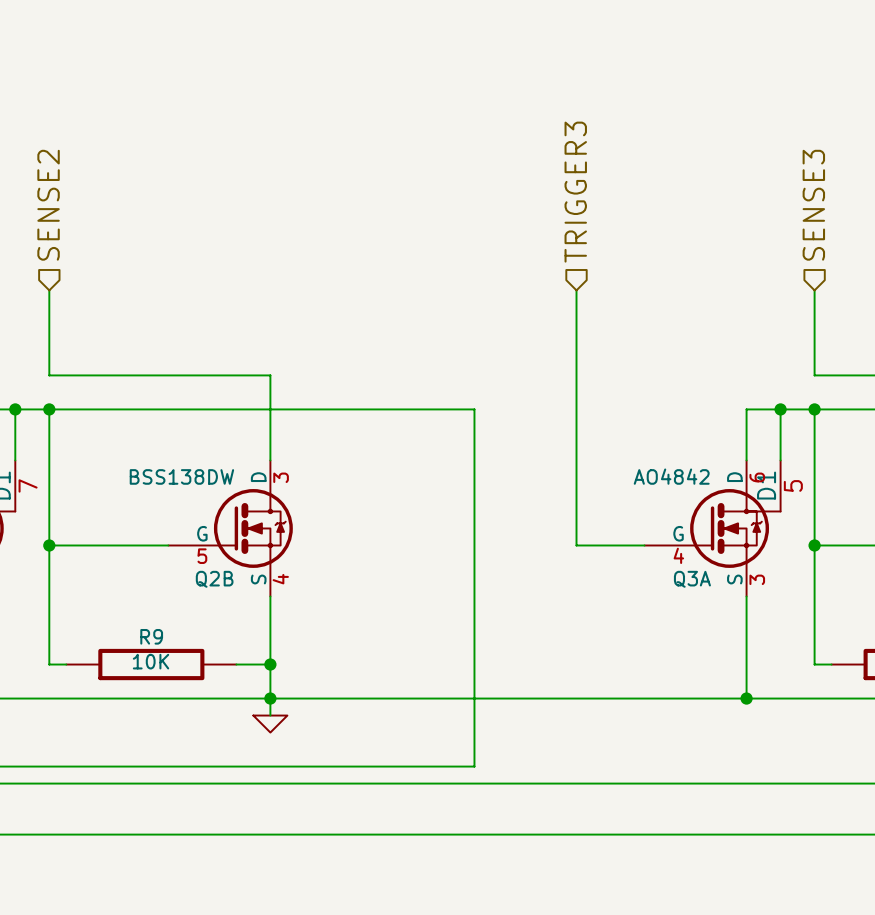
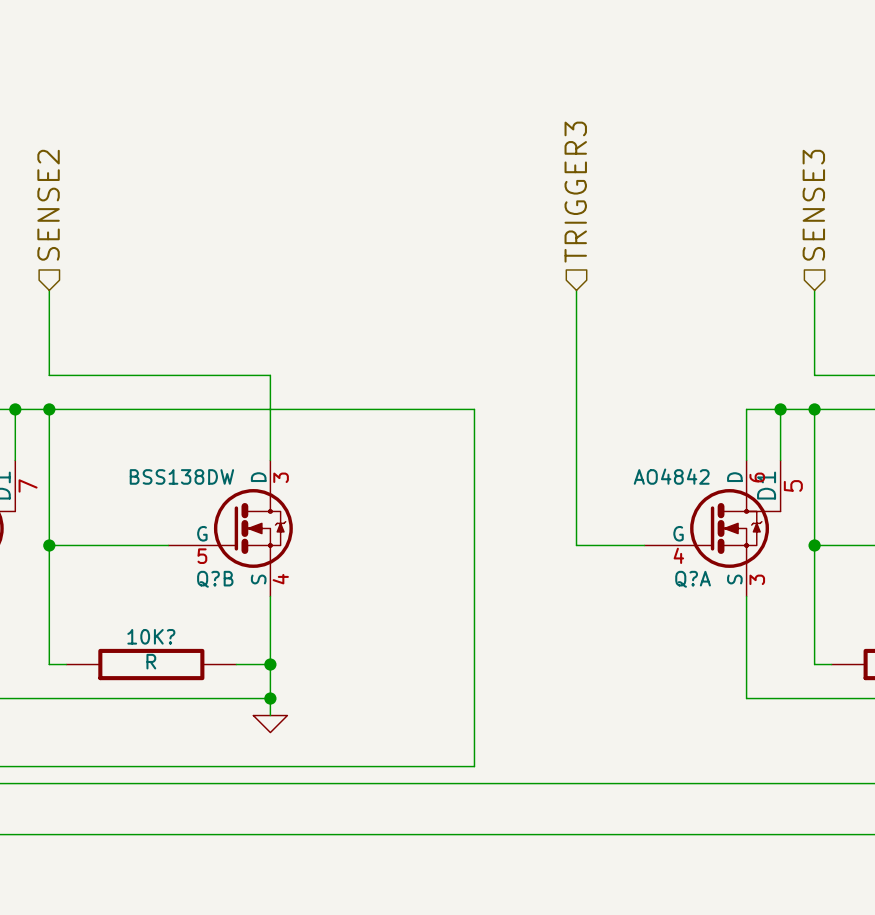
Q2B name: Q2B (214, 579) -> Q?B (215, 579)
Q3A name: Q3A (692, 579) -> Q?A (693, 579)
R9 name: R9 (151, 636) -> 10K? (151, 636)
R9 value: 10K (151, 661) -> R (151, 661)
wire: (270, 698) (746, 698) -> none
junction: (746, 698) -> none

